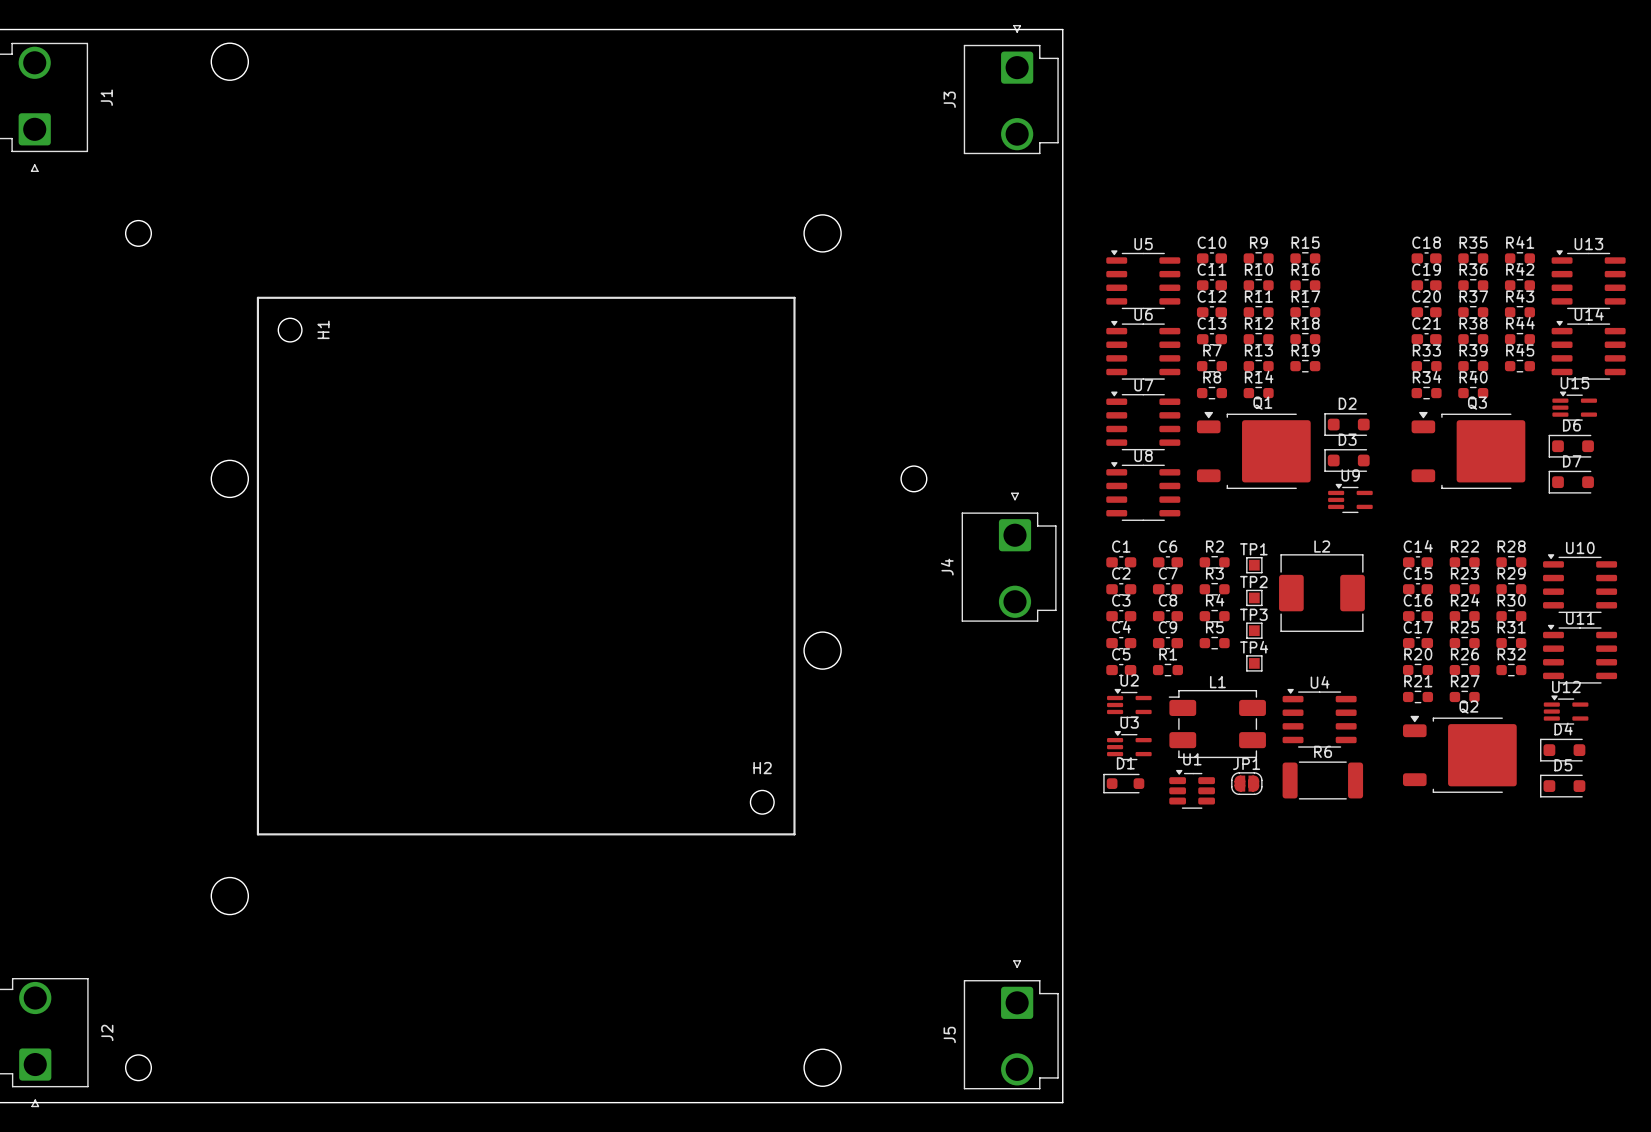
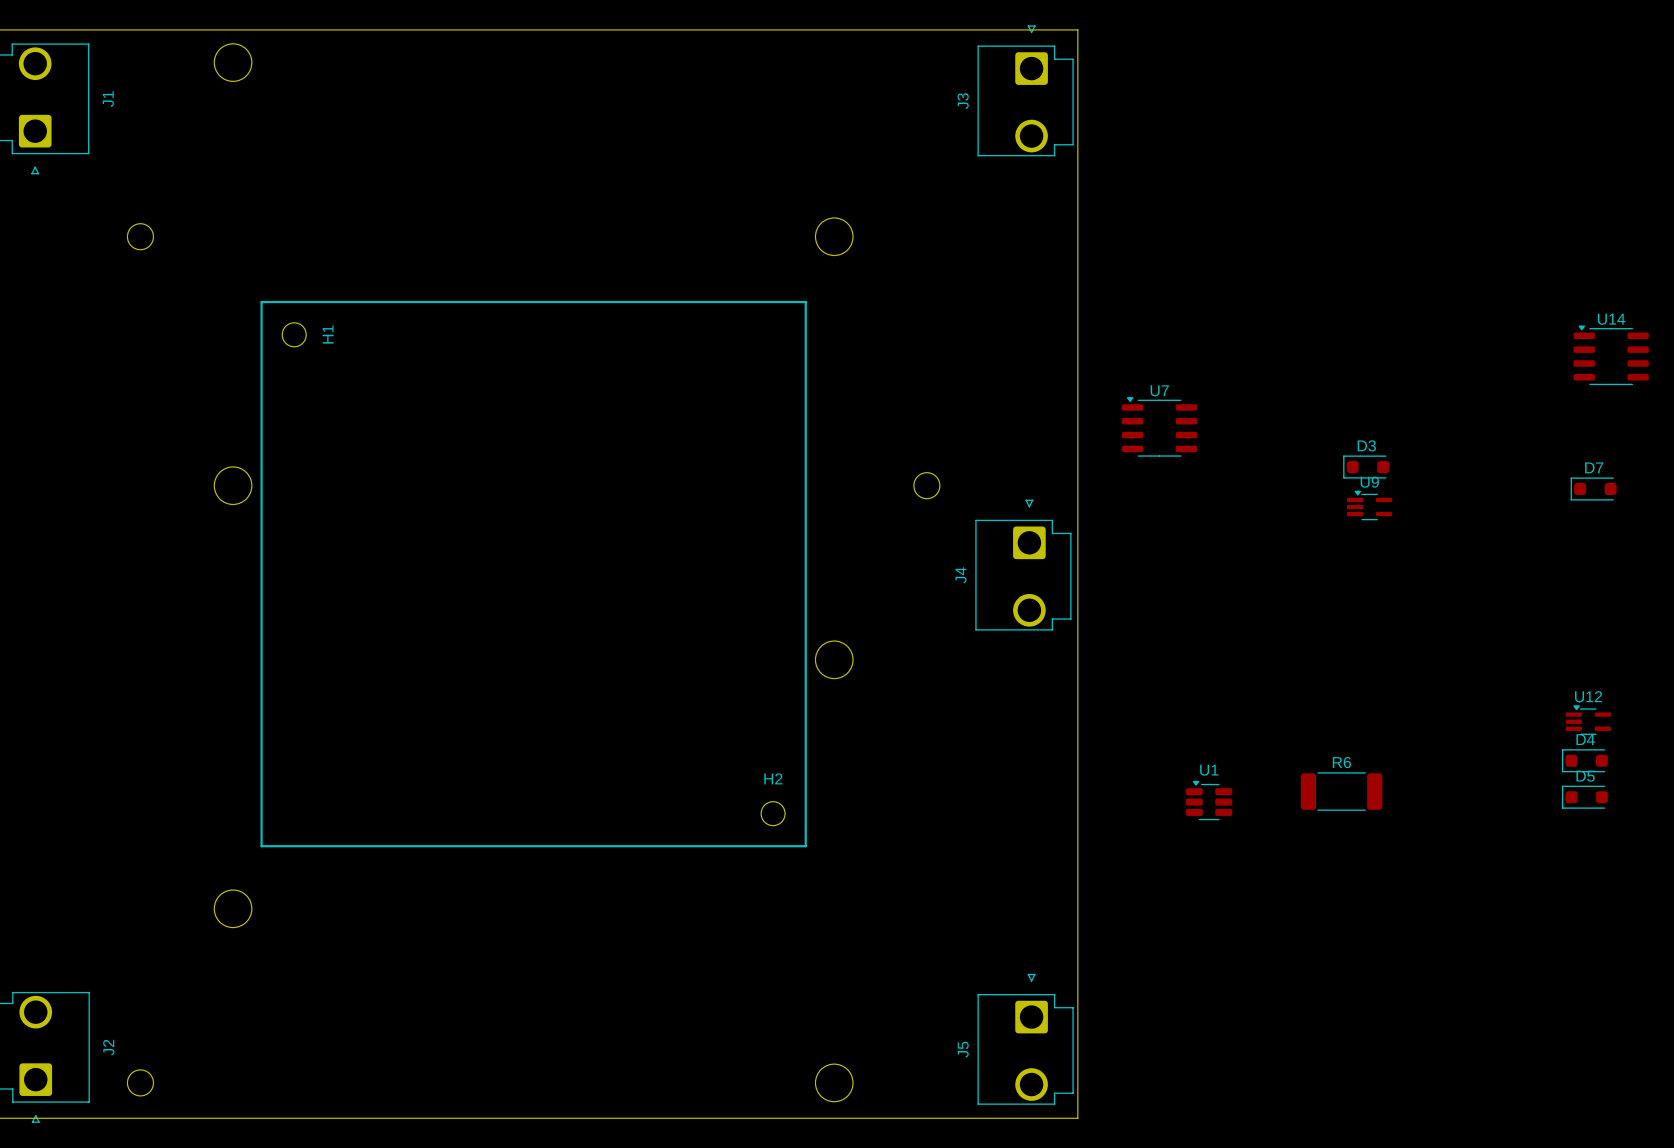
C10: (1211, 258) -> none
R9: (1258, 258) -> none
R15: (1305, 258) -> none
C18: (1426, 258) -> none
R35: (1473, 258) -> none
R41: (1519, 258) -> none
U5: (1143, 279) -> none
U13: (1588, 279) -> none
C11: (1211, 285) -> none
R10: (1258, 285) -> none
R16: (1305, 285) -> none
C19: (1426, 285) -> none
R36: (1473, 285) -> none
R42: (1519, 285) -> none
C12: (1211, 312) -> none
R11: (1258, 312) -> none
R17: (1305, 312) -> none
C20: (1426, 312) -> none
R37: (1473, 312) -> none
R43: (1519, 312) -> none
C13: (1211, 339) -> none
R12: (1258, 339) -> none
R18: (1305, 339) -> none
C21: (1426, 339) -> none
R38: (1473, 339) -> none
R44: (1519, 339) -> none
U6: (1143, 350) -> none
R7: (1211, 366) -> none
R13: (1258, 366) -> none
R19: (1305, 366) -> none
R33: (1426, 366) -> none
R39: (1473, 366) -> none
R45: (1519, 366) -> none
R8: (1211, 393) -> none
R14: (1258, 393) -> none
R34: (1426, 393) -> none
R40: (1473, 393) -> none
U15: (1574, 406) -> none
D2: (1347, 424) -> none
D6: (1571, 446) -> none
Q1: (1253, 450) -> none
Q3: (1468, 450) -> none
U8: (1143, 491) -> none
C1: (1121, 562) -> none
C6: (1167, 562) -> none
R2: (1214, 562) -> none
C14: (1418, 562) -> none
R22: (1464, 562) -> none
R28: (1511, 562) -> none
TP1: (1254, 565) -> none
U10: (1580, 583) -> none
C2: (1121, 589) -> none
C7: (1167, 589) -> none
R3: (1214, 589) -> none
C15: (1418, 589) -> none
R23: (1464, 589) -> none
R29: (1511, 589) -> none
L2: (1321, 593) -> none
TP2: (1254, 597) -> none
C3: (1121, 616) -> none
C8: (1167, 616) -> none
R4: (1214, 616) -> none
C16: (1418, 616) -> none
R24: (1464, 616) -> none
R30: (1511, 616) -> none
TP3: (1254, 630) -> none
C4: (1121, 643) -> none
C9: (1167, 643) -> none
R5: (1214, 643) -> none
C17: (1418, 643) -> none
R25: (1464, 643) -> none
R31: (1511, 643) -> none
U11: (1580, 654) -> none
TP4: (1254, 663) -> none
C5: (1121, 670) -> none
R1: (1167, 670) -> none
R20: (1418, 670) -> none
R26: (1464, 670) -> none
R32: (1511, 670) -> none
R21: (1418, 697) -> none
R27: (1464, 697) -> none
U2: (1129, 703) -> none
U4: (1319, 718) -> none
L1: (1217, 724) -> none
U3: (1129, 745) -> none
Q2: (1459, 754) -> none
D1: (1123, 783) -> none
JP1: (1246, 783) -> none

